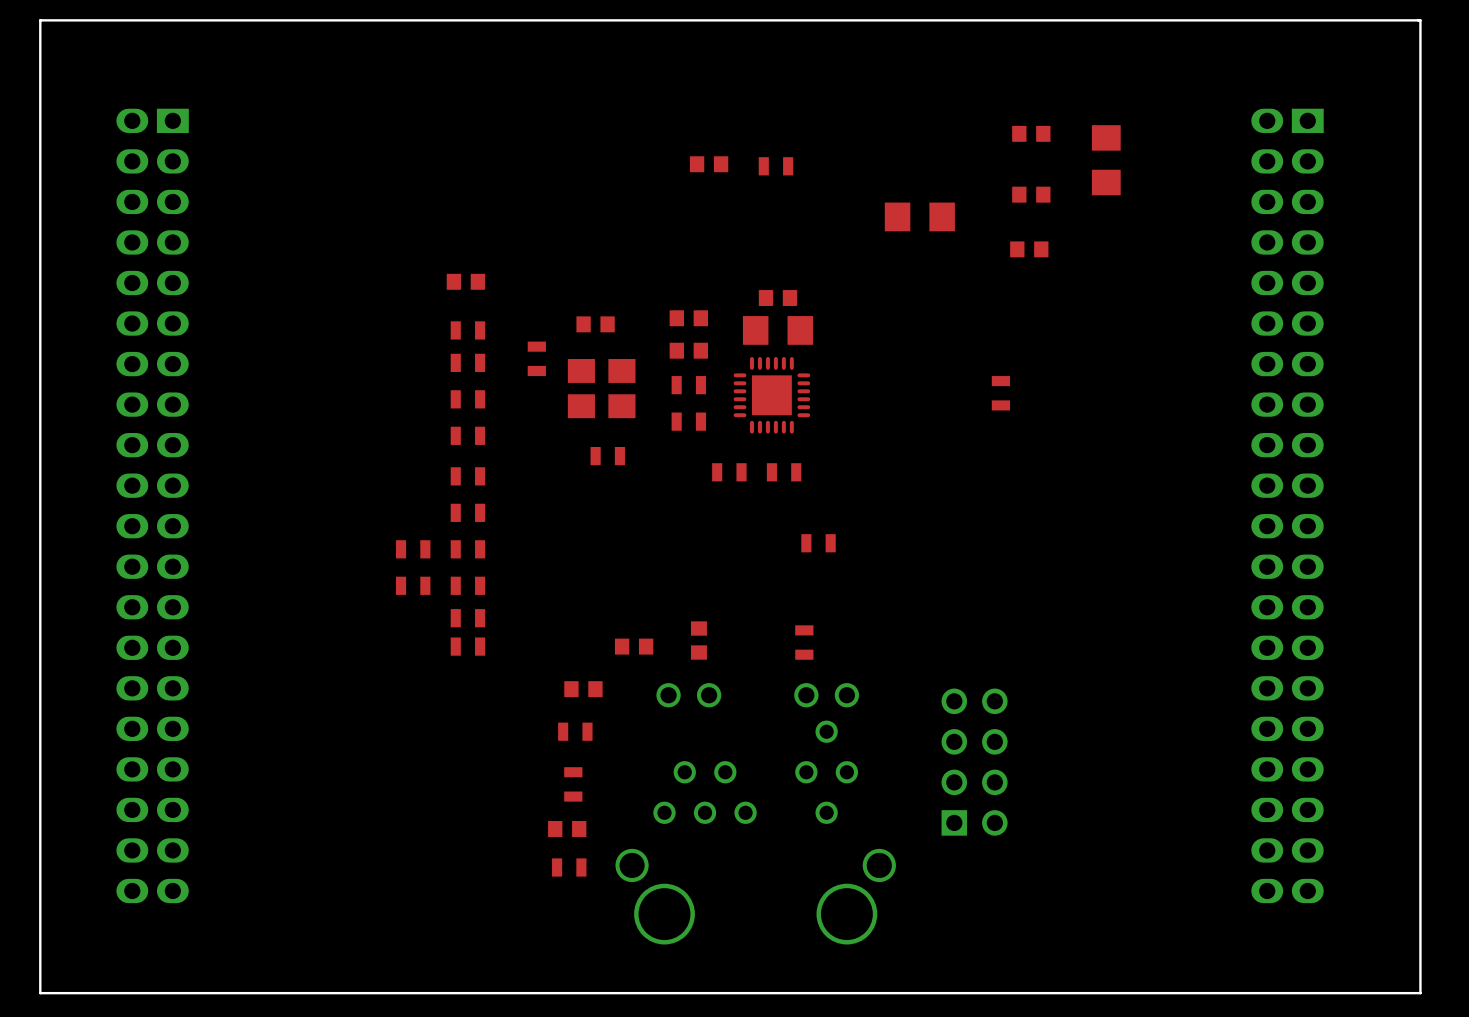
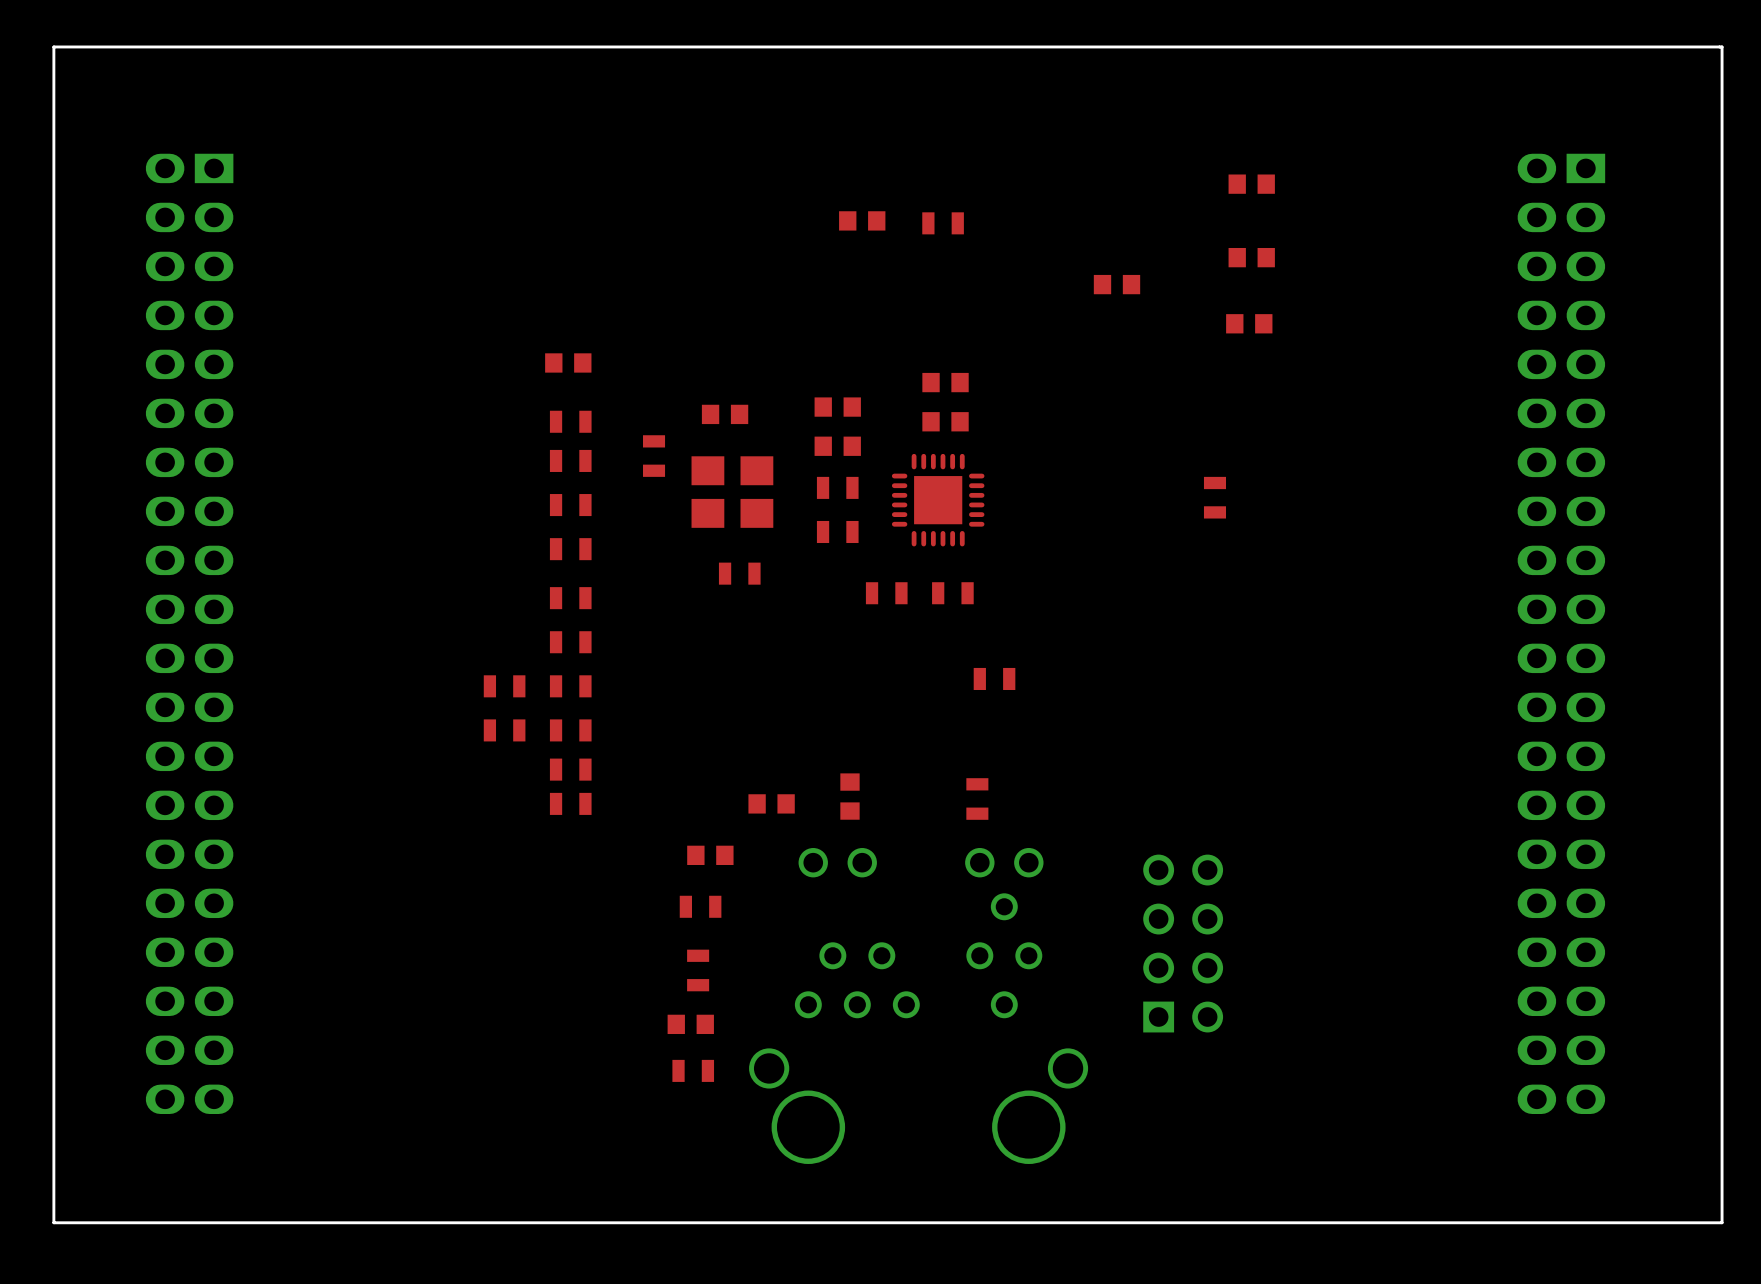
part: (1106, 160) -> none
part footprint: [884, 202, 955, 232] -> [1093, 274, 1141, 295]
part footprint: [742, 316, 814, 345] -> [922, 412, 969, 432]

